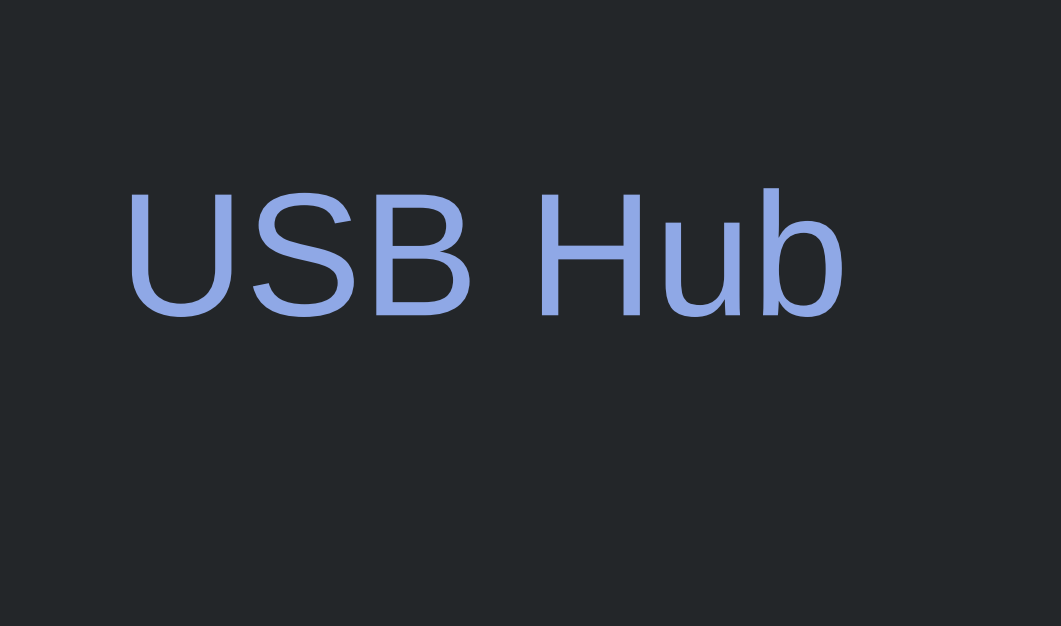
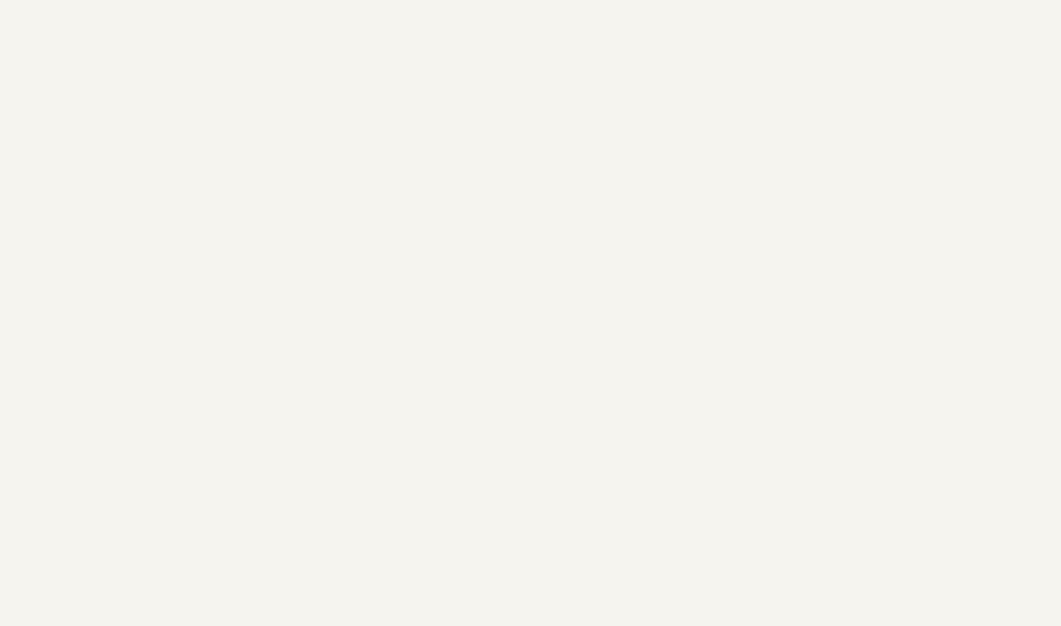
text: USB Hub (486, 252) -> none

